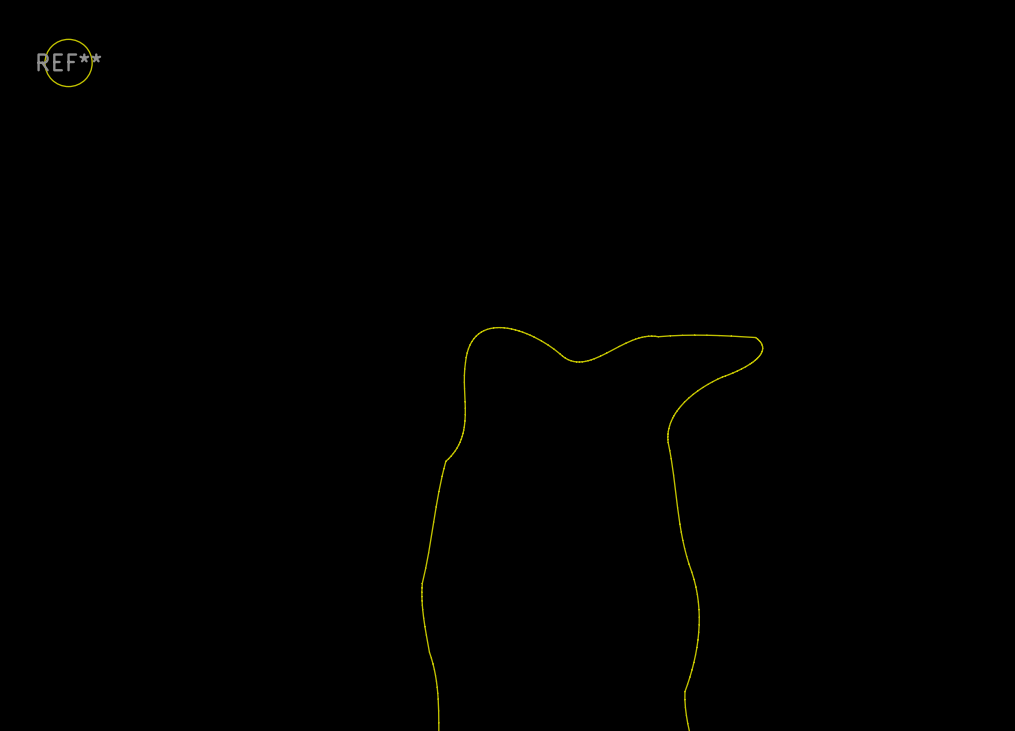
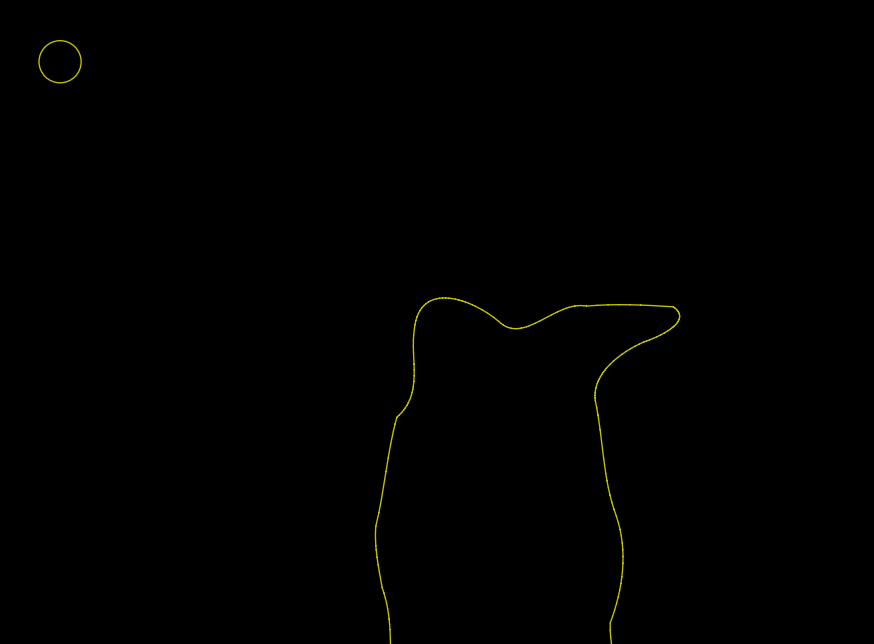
REF** name: REF** (69, 62) -> none

